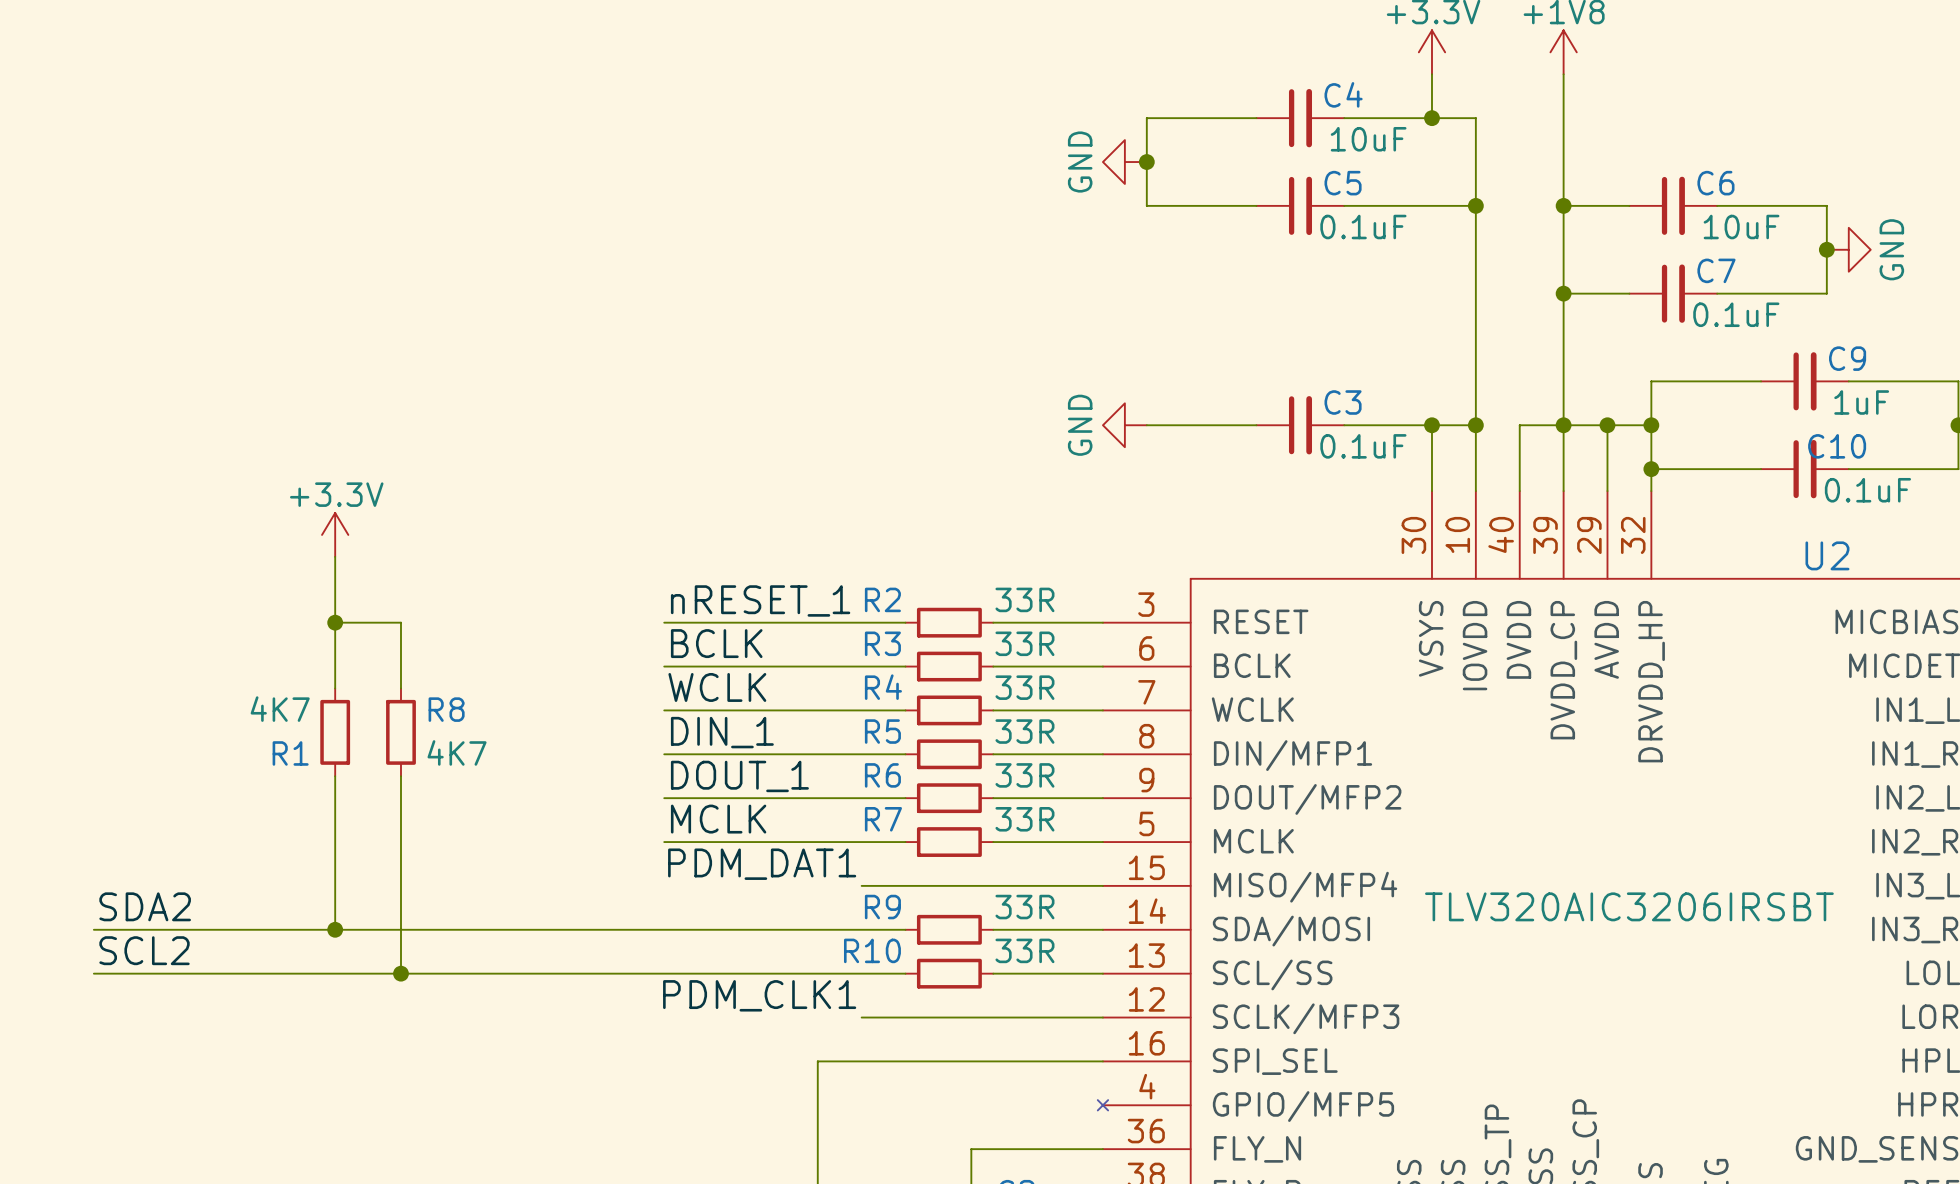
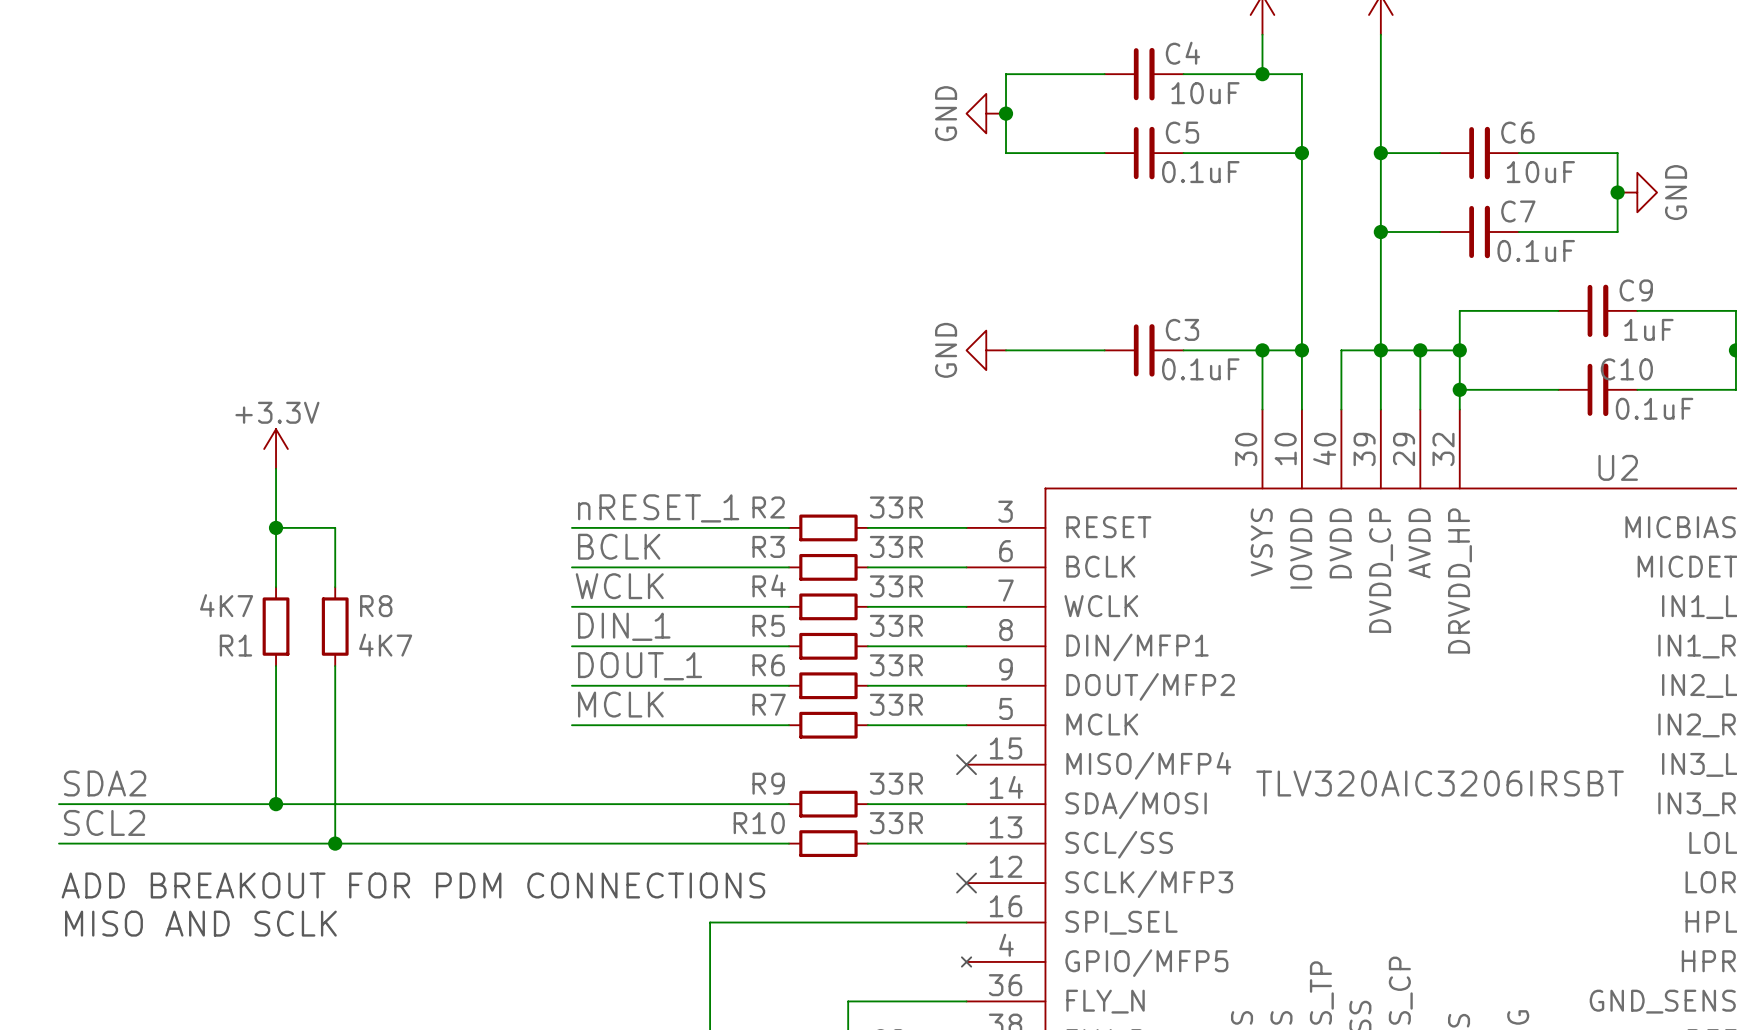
label: PDM_DAT1 (762, 864) -> none
wire: (861, 885) (1102, 885) -> none
no-connect mark: none -> (966, 764)
label: PDM_CLK1 (759, 995) -> none
wire: (861, 1017) (1102, 1017) -> none
no-connect mark: none -> (966, 883)
text: none -> ADD BREAKOUT FOR PDM CONNECTIONS (413, 885)
text: none -> MISO AND SCLK (200, 923)

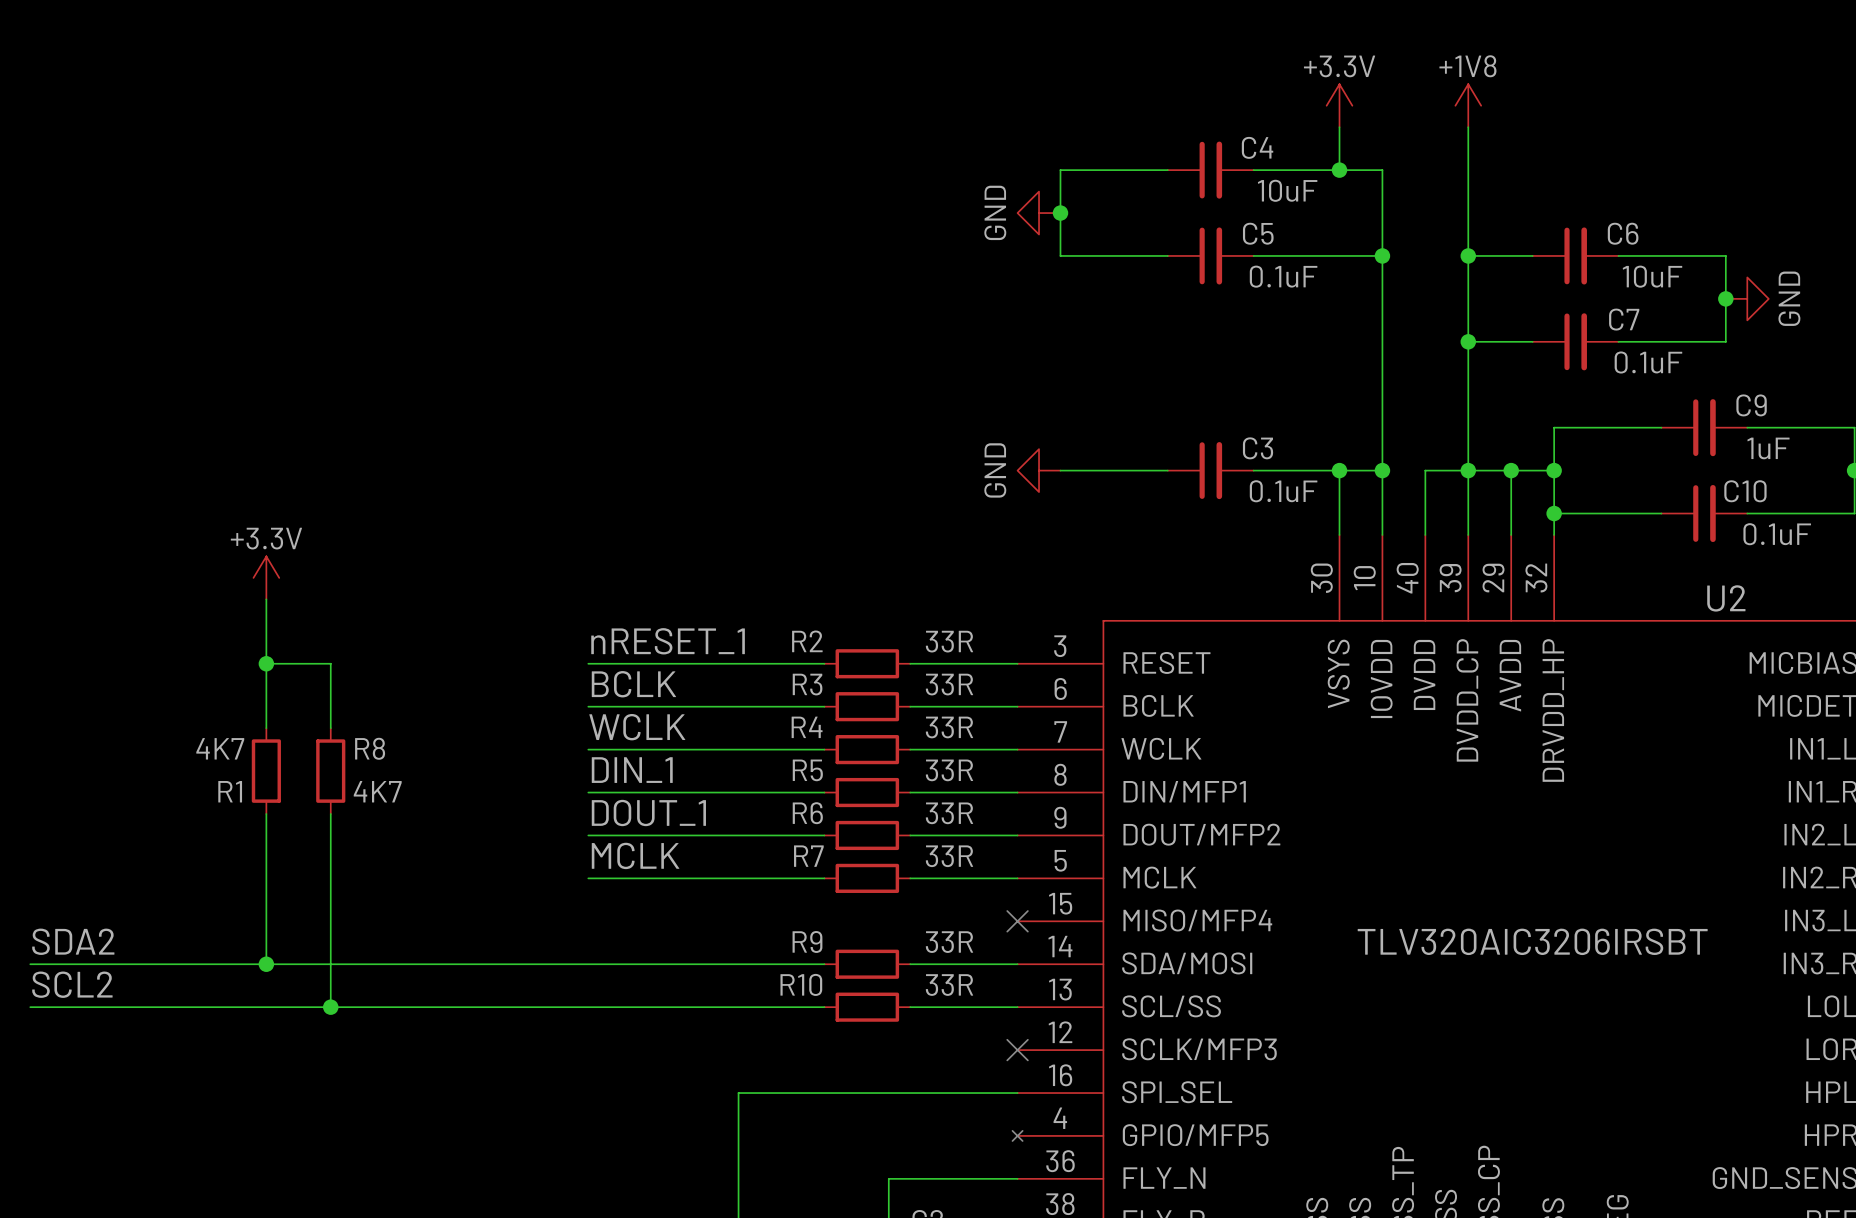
text: ADD BREAKOUT FOR PDM CONNECTIONS (413, 885) -> none
text: MISO AND SCLK (200, 923) -> none

